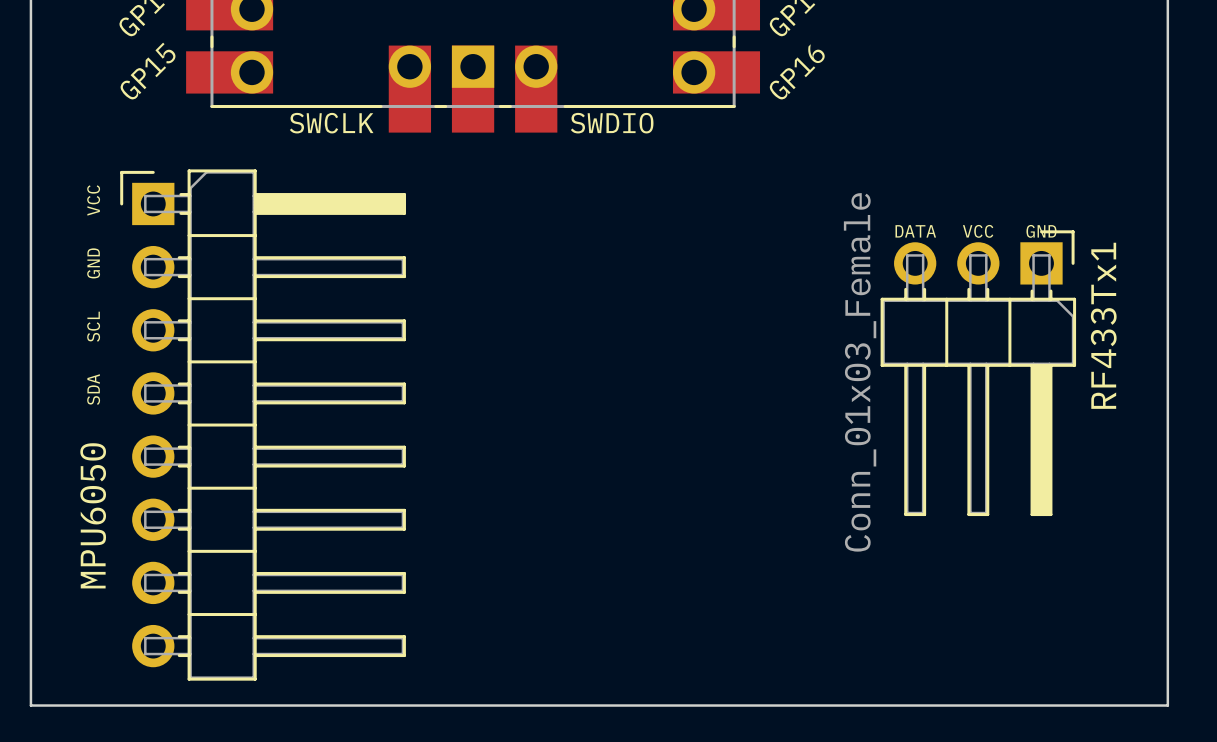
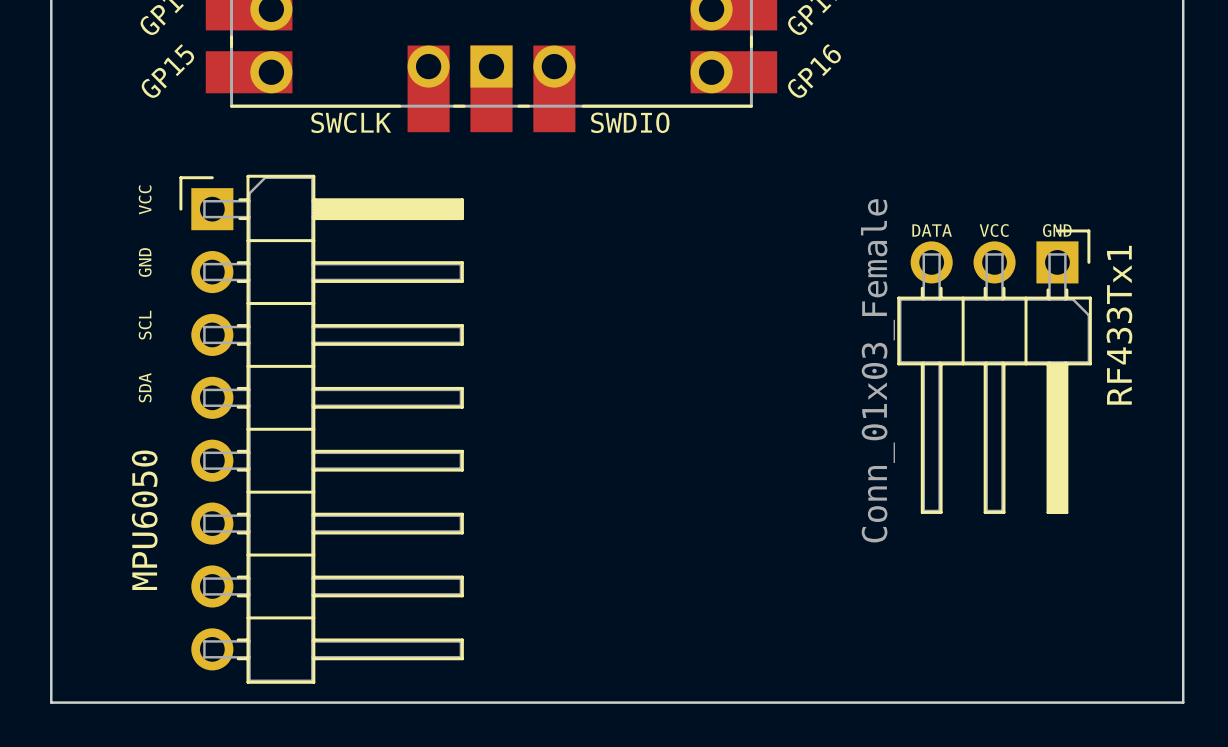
text position: VCC (93, 200) -> VCC (145, 199)
text position: GND (93, 263) -> GND (145, 262)
text position: SCL (93, 326) -> SCL (145, 325)
text position: SDA (93, 389) -> SDA (145, 387)
MPU6050 position: (263, 425) -> (321, 429)
MPU6050 name position: MPU6050 (93, 515) -> MPU6050 (144, 520)

